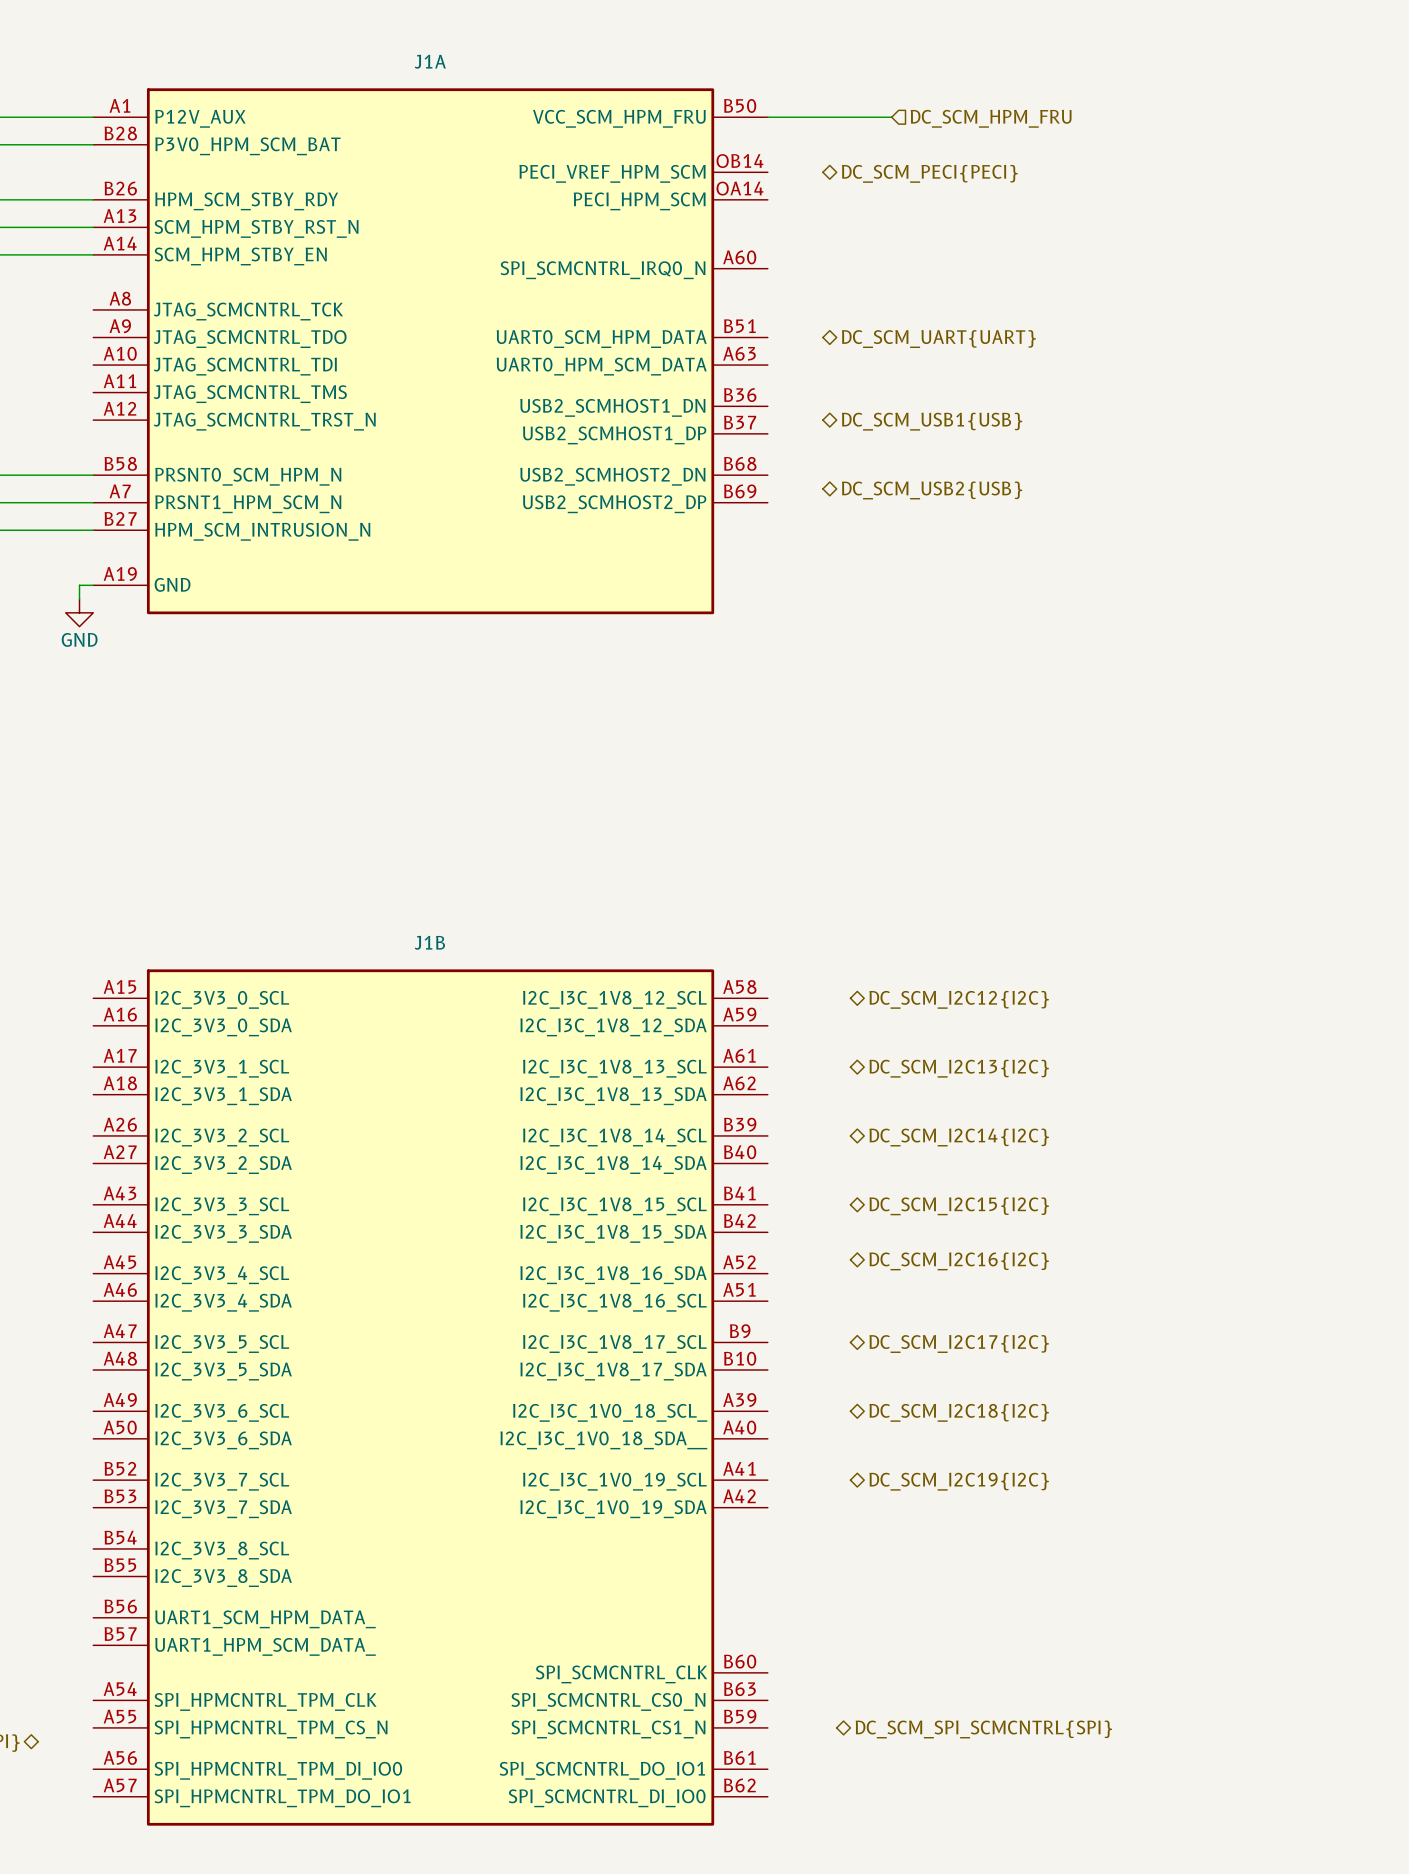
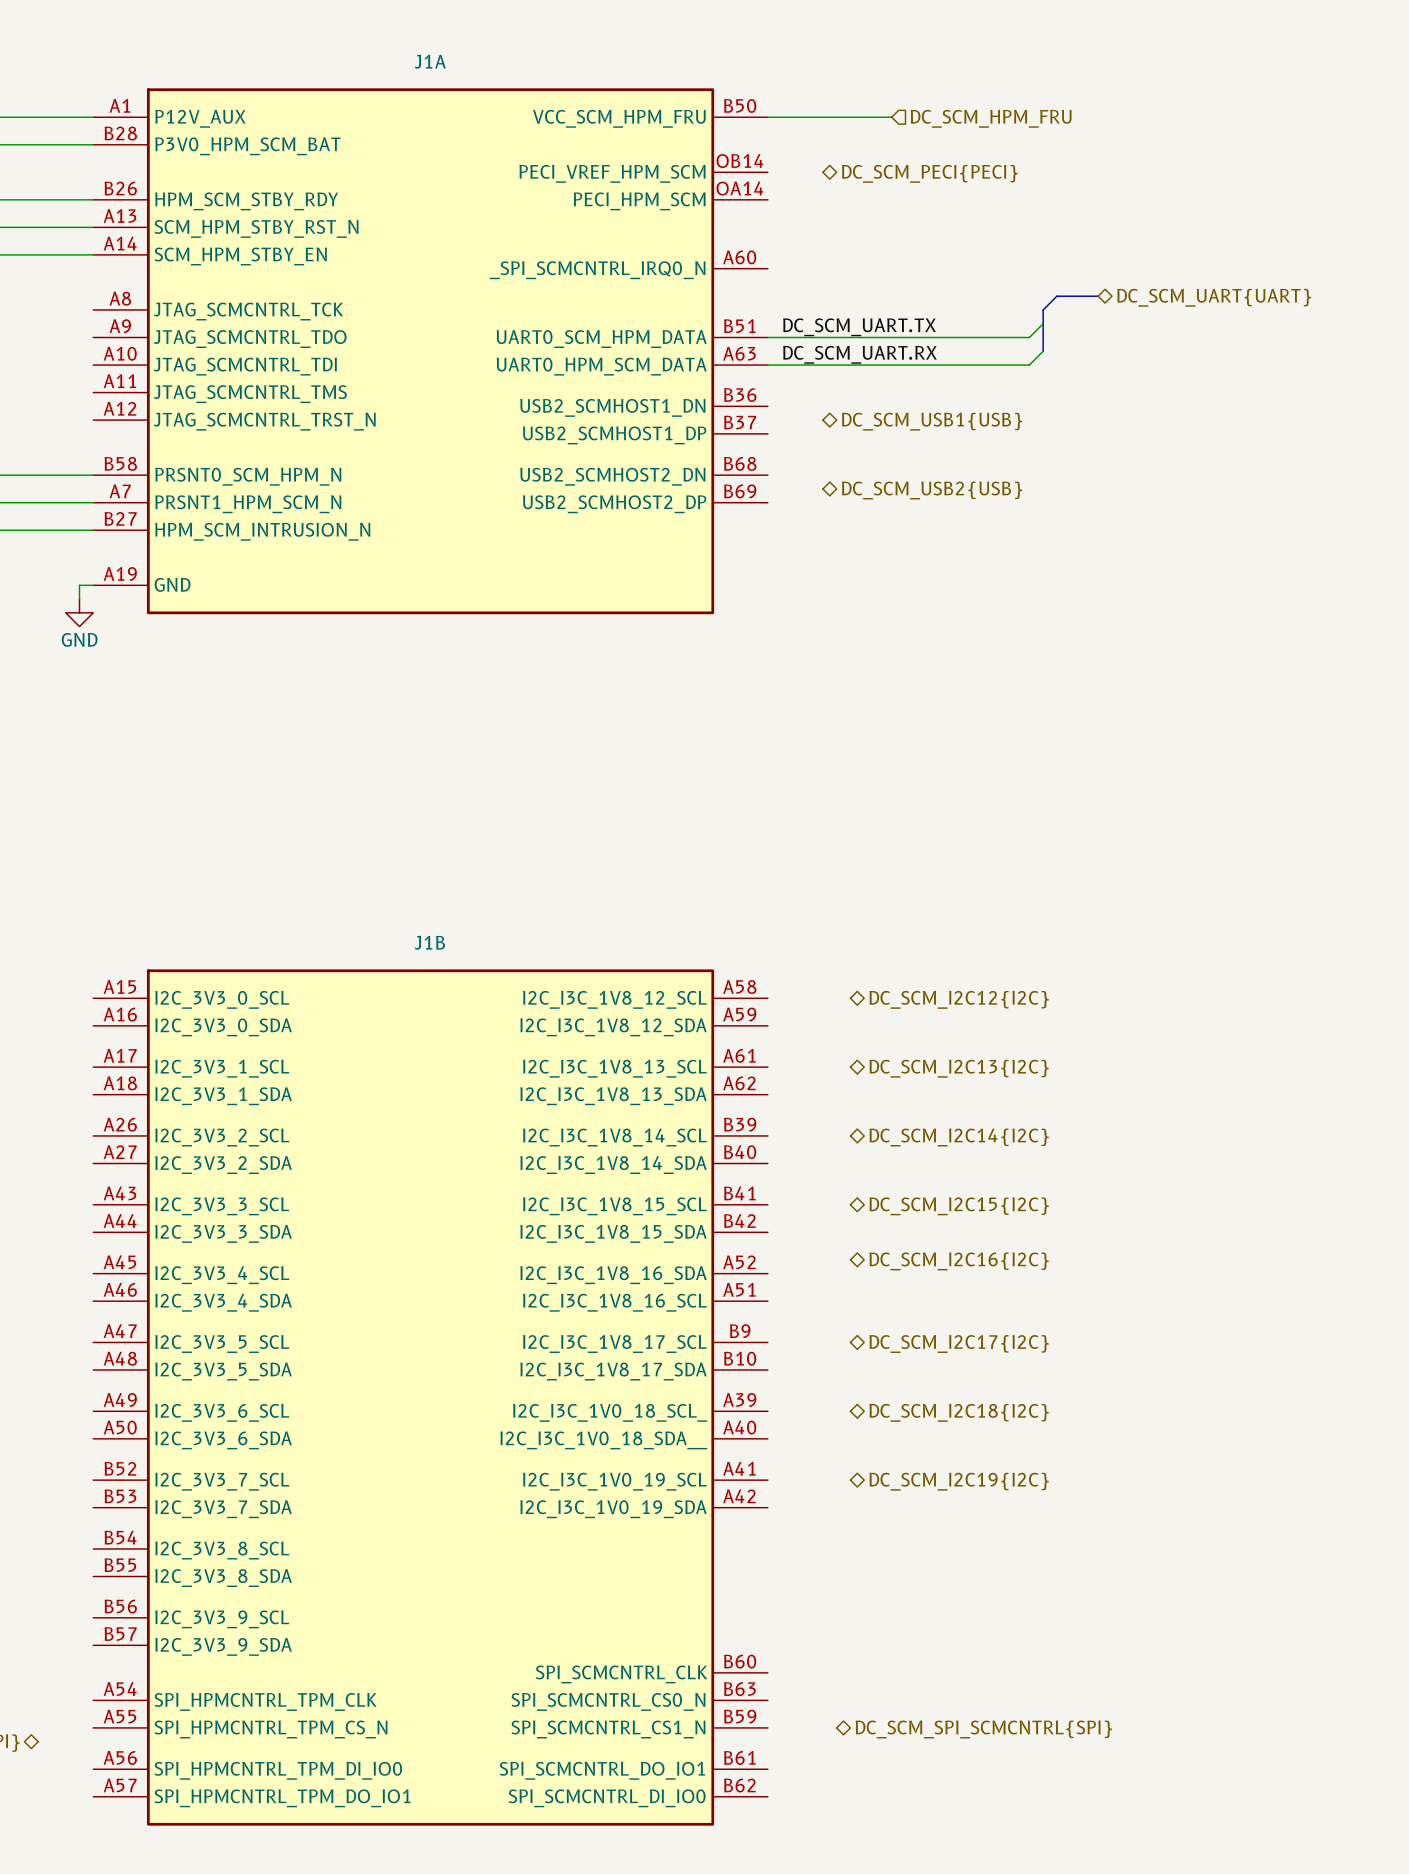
J1A pin name: SPI_SCMCNTRL_IRQ0_N (603, 270) -> _SPI_SCMCNTRL_IRQ0_N (597, 270)
bus: none -> (1098, 296) (1056, 296) (1043, 309) (1043, 351)
hierarchical label: none -> DC_SCM_UART{UART} (1214, 297)
wire: none -> (1043, 323) (1029, 337) (767, 337)
label: none -> DC_SCM_UART.TX (859, 327)
hierarchical label: DC_SCM_UART{UART} (938, 339) -> none
wire: none -> (1043, 351) (1029, 365) (767, 365)
label: none -> DC_SCM_UART.RX (859, 354)
J1B pin name: UART1_SCM_HPM_DATA_ (265, 1619) -> I2C_3V3_9_SCL (222, 1619)
J1B pin name: UART1_HPM_SCM_DATA_ (265, 1646) -> I2C_3V3_9_SDA (223, 1646)

